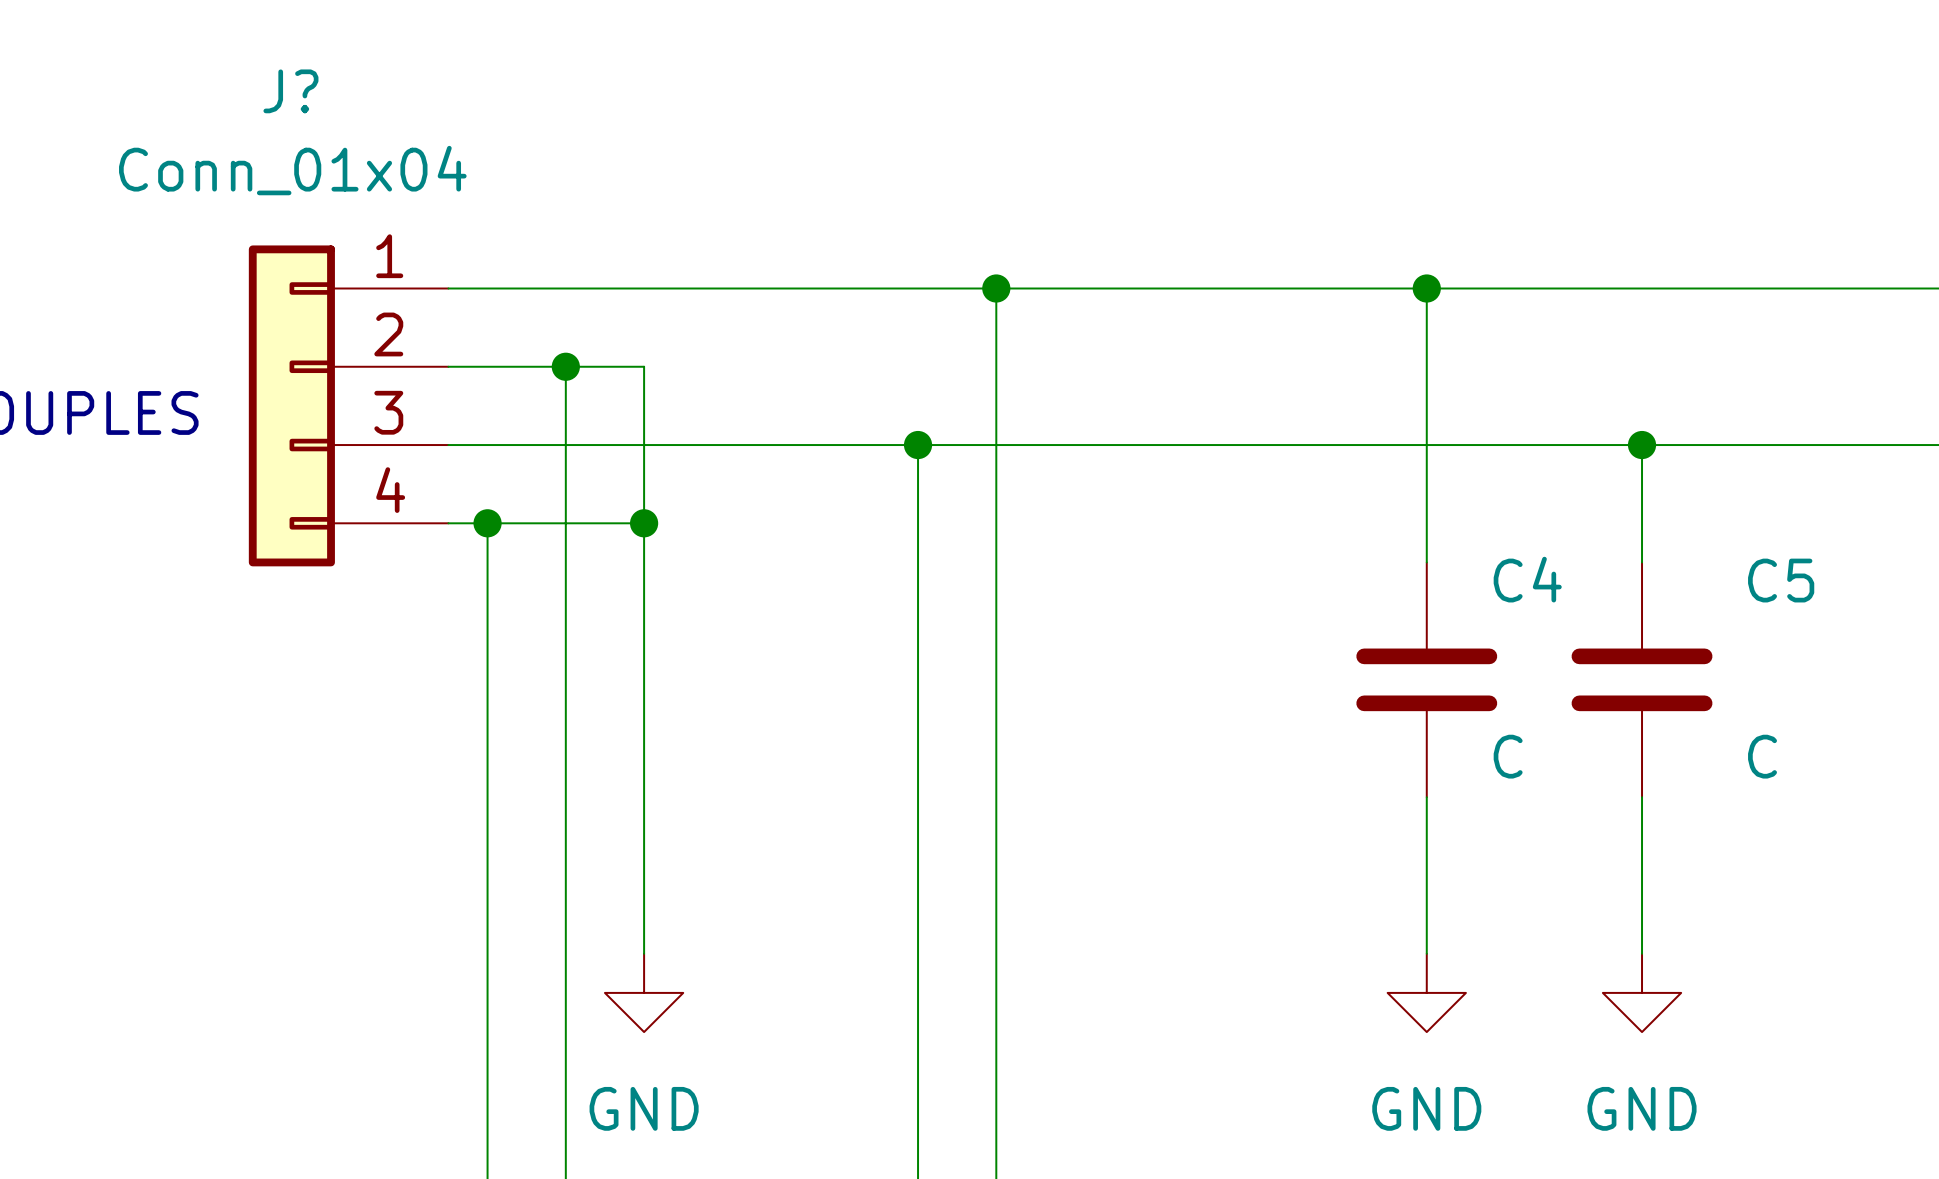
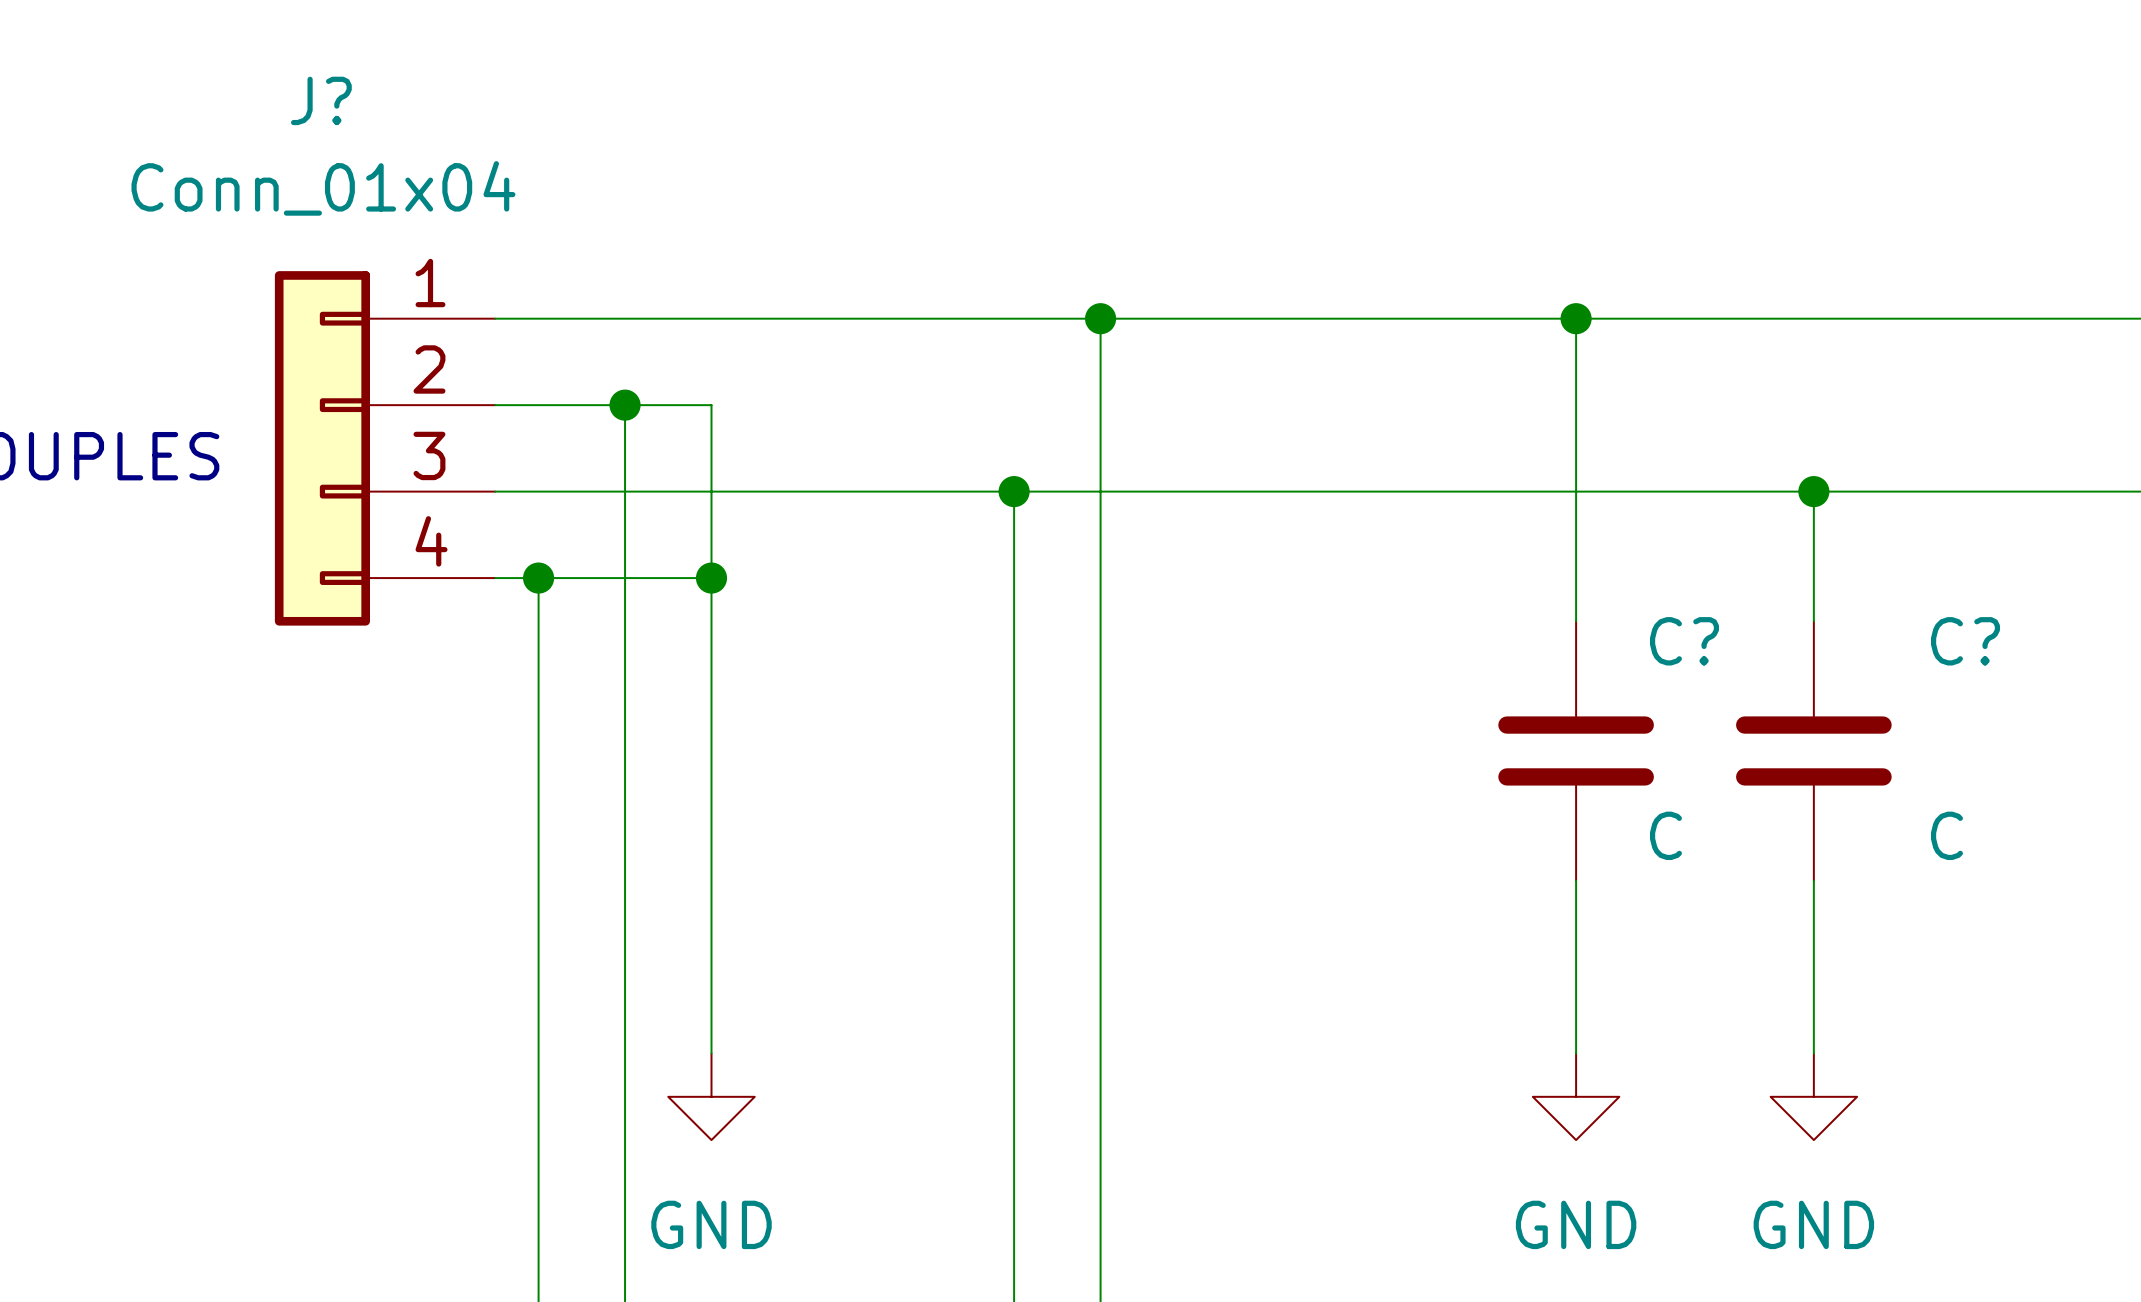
C4 name: C4 (1527, 579) -> C? (1684, 641)
C5 name: C5 (1781, 580) -> C? (1965, 641)

